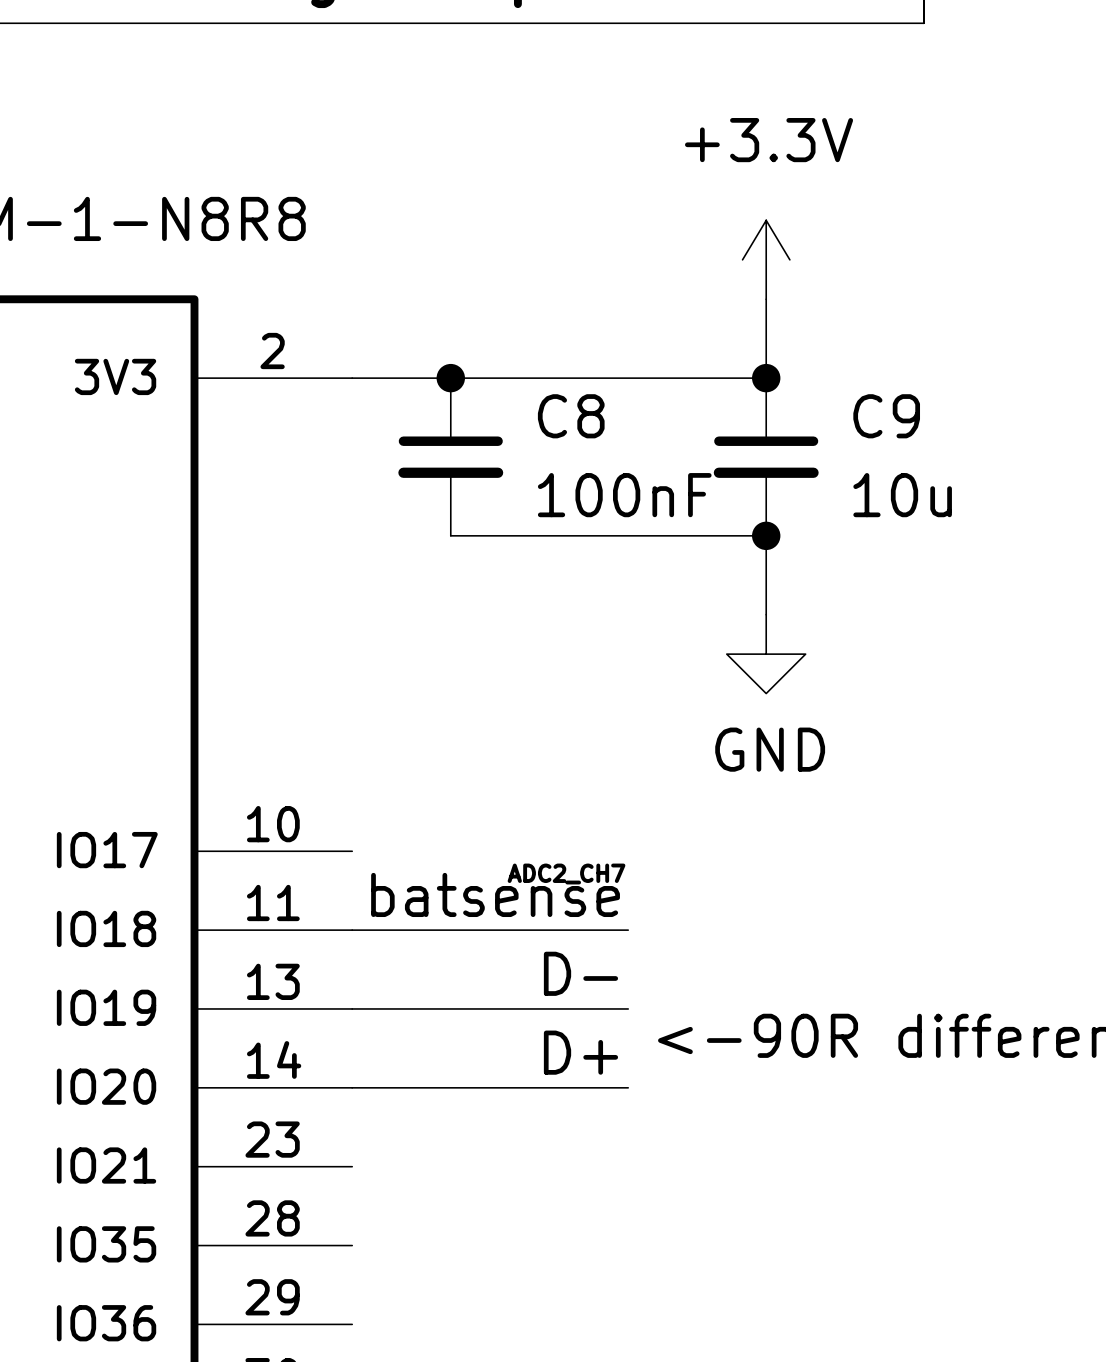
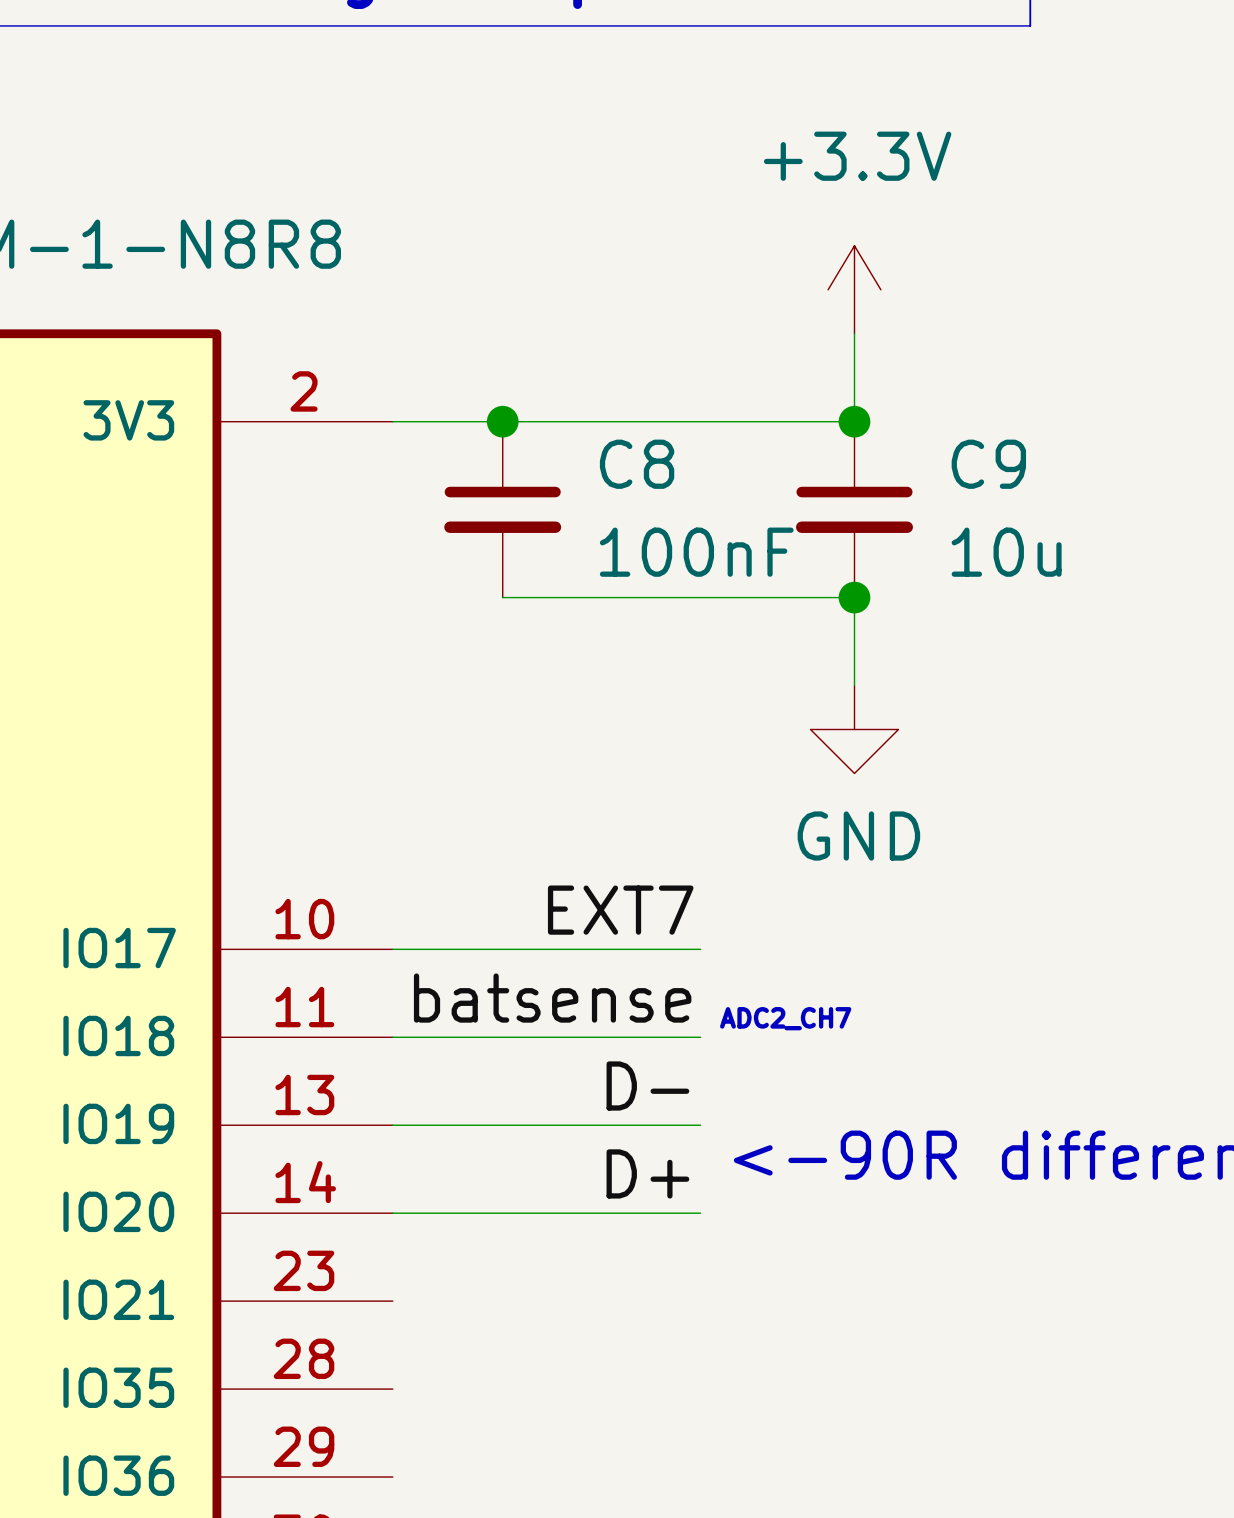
label: none -> EXT7 (620, 910)
wire: none -> (392, 949) (700, 949)
text position: ADC2_CH7 (566, 874) -> ADC2_CH7 (785, 1018)

